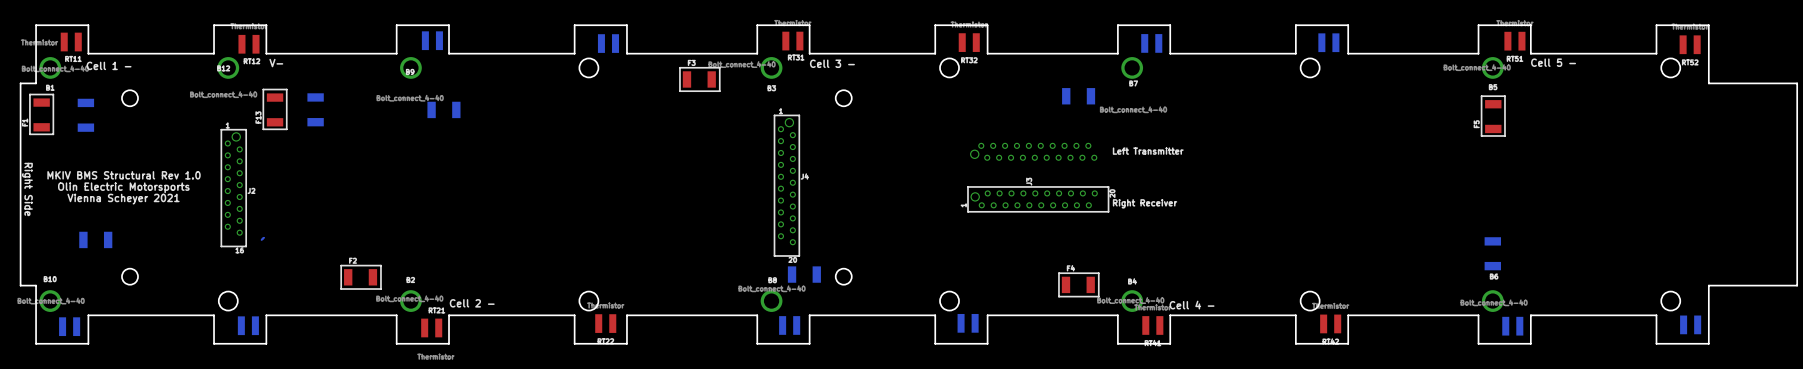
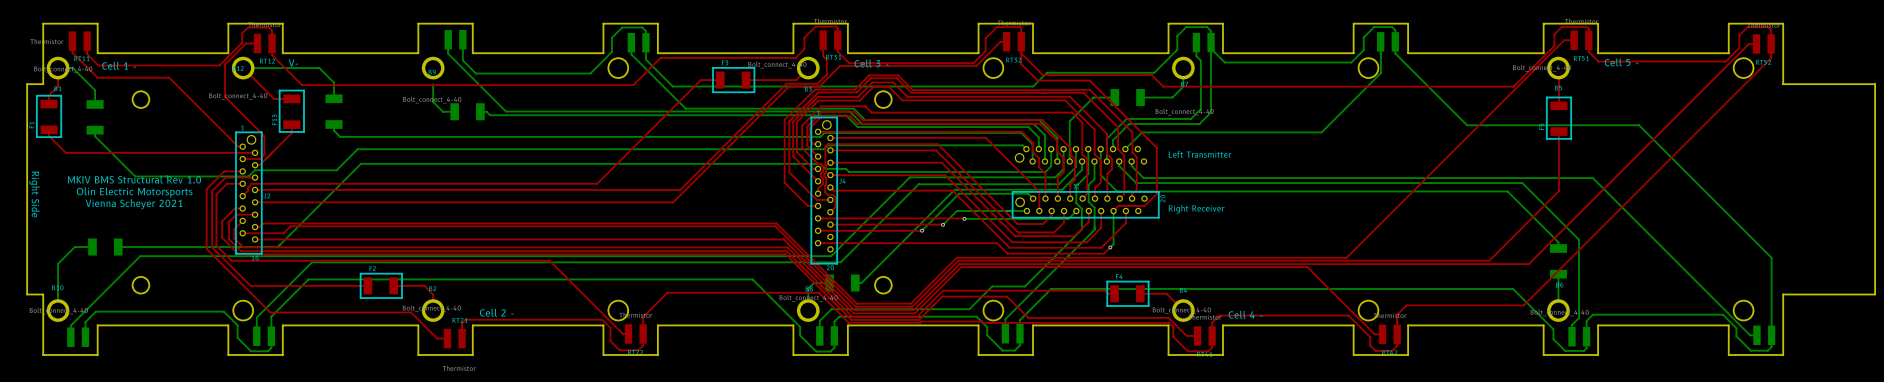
bottom track: none -> (448, 39) (448, 53) (505, 111) (849, 111) (862, 124) (1034, 124) (1044, 135) (1044, 161)
bottom track: none -> (462, 39) (462, 60) (475, 73) (590, 73) (611, 52) (611, 37) (622, 27) (642, 27) (645, 31) (645, 59) (672, 86) (1033, 86) (1046, 72) (1154, 72) (1177, 49) (1177, 36) (1186, 27) (1207, 27) (1211, 30) (1211, 112) (1199, 124) (1129, 124) (1113, 140) (1113, 149)
top track: none -> (823, 40) (823, 56) (826, 59) (826, 74) (817, 83) (786, 83) (680, 189) (255, 189)
top track: none -> (1574, 40) (1564, 40) (1346, 257) (956, 257) (910, 303) (856, 303) (776, 223) (263, 223) (259, 227) (255, 227)
top track: none -> (72, 41) (72, 52) (97, 77) (169, 77) (238, 146) (242, 146)
top track: none -> (87, 41) (87, 54) (98, 65) (219, 65) (227, 57)
top track: none -> (1006, 41) (1000, 41) (976, 65) (840, 65) (819, 86) (788, 86) (673, 202) (255, 202)
bottom track: none -> (1380, 41) (1380, 73) (1321, 132) (1142, 132) (1125, 149)
bottom track: none -> (631, 42) (631, 54) (685, 108) (853, 108) (865, 120) (1039, 120) (1057, 138) (1057, 161)
bottom track: none -> (1196, 42) (1196, 56) (1200, 60) (1200, 109) (1191, 118) (1126, 118) (1106, 138) (1106, 161)
top track: none -> (257, 43) (246, 43) (225, 64) (225, 96) (264, 136) (264, 154) (259, 159) (242, 159)
top track: none -> (1756, 43) (1748, 43) (1528, 264) (959, 264) (913, 310) (854, 310) (783, 239) (255, 239)
bottom track: none -> (1211, 48) (1224, 62) (1351, 62) (1363, 50) (1363, 37) (1374, 27) (1392, 27) (1395, 30) (1395, 53) (1467, 125) (1639, 125) (1771, 257) (1771, 346) (1767, 350) (1750, 350) (1736, 336) (1736, 328) (1722, 314) (1592, 314) (1586, 321) (1586, 348) (1583, 350) (1565, 350) (1553, 339) (1553, 329) (1513, 288) (1051, 288) (1020, 320) (1020, 345) (1014, 350) (1002, 350) (987, 335) (987, 327) (976, 316) (839, 316) (834, 321) (834, 347) (830, 351) (816, 351) (800, 335) (800, 326) (752, 279) (308, 279) (271, 316) (271, 347) (267, 351) (251, 351) (237, 337) (237, 325) (223, 311) (95, 311) (85, 322) (85, 337)
top track: none -> (1021, 53) (1042, 75) (1151, 75) (1163, 86) (1513, 86) (1554, 45) (1554, 34) (1561, 26) (1587, 26) (1588, 28) (1588, 51) (1598, 61) (1725, 61) (1739, 48) (1739, 35) (1747, 27) (1768, 27) (1771, 29) (1771, 57) (1523, 305) (1406, 305) (1397, 314) (1397, 345) (1392, 350) (1375, 350) (1370, 345) (1370, 337) (1348, 315) (1219, 315) (1212, 322) (1212, 347) (1208, 351) (1187, 351) (1173, 336) (1173, 326) (1169, 322) (848, 322) (818, 292) (667, 292) (643, 317) (643, 345) (638, 350) (619, 350) (610, 341) (610, 328) (602, 319) (465, 319) (462, 323) (462, 338)
top track: none -> (227, 57) (242, 42) (242, 33) (248, 27) (269, 27) (272, 30) (272, 55) (302, 85) (633, 85) (660, 57) (795, 57) (804, 49) (804, 37) (815, 26) (837, 28) (837, 51) (849, 63) (973, 63) (985, 51) (985, 38) (997, 27) (1020, 27) (1021, 64) (1037, 80) (1089, 80) (1156, 147) (1156, 193) (1144, 205) (1118, 205) (1113, 211)
bottom track: none -> (58, 68) (72, 68) (95, 90) (95, 104)
top track: none -> (58, 68) (58, 86) (49, 95) (49, 104)
bottom track: none -> (243, 68) (319, 68) (334, 82) (334, 98)
top track: none -> (243, 68) (274, 98) (291, 98)
top track: none -> (808, 68) (796, 80) (746, 80)
bottom track: none -> (1183, 68) (1183, 86) (1172, 97) (1140, 97)
top track: none -> (1558, 68) (1558, 105)
top track: none -> (720, 80) (700, 80) (597, 183) (251, 183) (242, 196)
bottom track: none -> (433, 84) (433, 101) (443, 111) (454, 111)
bottom track: none -> (1114, 97) (1093, 97) (1069, 121) (1069, 161)
bottom track: none -> (480, 111) (486, 111) (490, 115) (846, 115) (857, 127) (1028, 127) (1038, 137) (1038, 149)
top track: none -> (291, 124) (291, 132) (259, 165) (255, 165)
bottom track: none -> (334, 124) (334, 130) (340, 136) (820, 136) (824, 132) (1021, 132) (1032, 144) (1032, 161)
top track: none -> (49, 129) (49, 136) (65, 152) (255, 152)
bottom track: none -> (95, 130) (95, 136) (135, 176) (248, 176) (254, 170) (336, 170) (357, 149) (824, 149) (828, 145) (1022, 145) (1026, 149)
top track: none -> (1558, 131) (1558, 191) (1489, 260) (958, 260) (912, 306) (855, 306) (775, 226) (290, 226) (283, 233) (242, 233)
top track: none -> (818, 131) (1021, 131) (1032, 142) (1032, 151) (1038, 158) (1038, 167) (1045, 173) (1045, 198)
top track: none -> (830, 137) (985, 137) (1039, 191) (1039, 211)
top track: none -> (818, 144) (813, 144) (810, 140) (810, 127) (821, 116) (850, 116) (857, 123) (1040, 123) (1057, 140) (1057, 151) (1063, 157) (1063, 172) (1057, 177) (1057, 198)
bottom track: none -> (1051, 149) (1051, 166) (1045, 172) (849, 172) (846, 168) (825, 168) (820, 163) (360, 163) (280, 244)
bottom track: none -> (1063, 149) (1063, 169) (1055, 177) (909, 177) (831, 256) (140, 256) (70, 325) (70, 337)
bottom track: none -> (1075, 149) (1075, 167) (1058, 184) (918, 184) (840, 262) (311, 262) (256, 317) (256, 336)
bottom track: none -> (1088, 149) (1088, 174) (1076, 186) (1076, 203) (1081, 208) (1081, 229) (1024, 286) (992, 286) (969, 309) (831, 309) (819, 320) (819, 335)
bottom track: none -> (1100, 149) (1100, 174) (1117, 191) (1507, 191) (1558, 242) (1558, 248)
top track: none -> (830, 150) (935, 150) (1018, 232) (1054, 232) (1064, 222) (1064, 211)
top track: none -> (818, 156) (807, 145) (807, 126) (822, 111) (854, 111) (862, 119) (1042, 119) (1070, 148) (1070, 155) (1074, 159) (1074, 179) (1070, 184) (1070, 198)
bottom track: none -> (1082, 161) (1082, 169) (1062, 189) (954, 189) (861, 283) (855, 283)
bottom track: none -> (1094, 161) (1094, 179) (1088, 184) (1088, 201) (1094, 207) (1094, 229) (1005, 319) (1005, 333)
bottom track: none -> (1119, 161) (1119, 165) (1136, 183) (1522, 183) (1579, 239) (1579, 318) (1571, 325) (1571, 336)
bottom track: none -> (1131, 161) (1131, 165) (1143, 178) (1592, 178) (1750, 335) (1756, 335)
top track: none -> (830, 162) (941, 162) (1015, 236) (1074, 236) (1088, 221) (1088, 211)
top track: none -> (818, 168) (813, 168) (796, 152) (796, 122) (818, 100) (859, 100) (873, 86) (888, 86) (902, 100) (1065, 100) (1094, 129) (1094, 154) (1100, 160) (1100, 182) (1094, 188) (1094, 198)
top track: none -> (825, 170) (825, 146) (827, 144) (937, 144) (1017, 223) (1043, 223) (1051, 215) (1051, 211)
top track: none -> (825, 170) (825, 191) (835, 197) (835, 207) (830, 212)
top track: none -> (242, 171) (224, 171) (206, 189) (206, 248) (270, 312) (411, 312) (437, 338) (447, 338)
top track: none -> (830, 175) (945, 175) (1012, 242) (1086, 242) (1101, 227) (1101, 211)
top track: none -> (255, 177) (225, 177) (212, 191) (212, 247) (250, 285) (367, 285)
top track: none -> (818, 181) (793, 156) (793, 121) (817, 96) (858, 96) (872, 82) (893, 82) (907, 96) (1069, 96) (1106, 133) (1106, 153) (1111, 158) (1111, 169) (1107, 173) (1107, 198)
top track: none -> (242, 183) (226, 183) (216, 194) (216, 245) (231, 260) (549, 260) (605, 316)
top track: none -> (830, 187) (833, 190) (952, 190) (1009, 247) (1101, 247) (1125, 223) (1125, 211)
top track: none -> (818, 193) (818, 188) (823, 183) (820, 176) (823, 166) (802, 148) (802, 125) (821, 106) (865, 106) (871, 112) (1072, 112) (1082, 122) (1082, 154) (1087, 159) (1087, 194) (1082, 198)
bottom track: none -> (1033, 198) (1028, 193) (959, 193) (922, 230)
top track: none -> (1119, 198) (1124, 194) (1124, 155) (1118, 149) (1118, 127) (1083, 92) (911, 92) (896, 78) (870, 78) (856, 92) (818, 92) (789, 121) (789, 172) (816, 199) (830, 199)
top track: none -> (1132, 198) (1132, 194) (1136, 189) (1136, 156) (1132, 152) (1132, 132) (1090, 90) (912, 90) (898, 75) (869, 75) (854, 89) (814, 89) (784, 119) (784, 182) (807, 206) (818, 206)
top track: none -> (242, 208) (234, 208) (222, 221) (222, 237) (238, 254) (785, 254) (851, 319) (919, 319) (942, 296) (1007, 296) (1028, 317) (1168, 317) (1186, 335) (1197, 335)
bottom track: none -> (1026, 211) (956, 211) (943, 224)
bottom track: none -> (1076, 211) (1068, 218) (964, 218)
bottom track: none -> (1113, 211) (1113, 244) (1110, 247)
top track: none -> (255, 214) (236, 214) (229, 221) (229, 239) (241, 251) (786, 251) (852, 317) (916, 317) (943, 290) (1105, 290) (1108, 293) (1114, 293)
top track: none -> (818, 218) (964, 218)
via: none -> (964, 218)
top track: none -> (242, 220) (234, 229) (234, 238) (243, 247) (787, 247) (853, 313) (914, 313) (961, 267) (1307, 267) (1374, 334) (1382, 334)
top track: none -> (830, 224) (943, 224)
via: none -> (943, 224)
top track: none -> (922, 230) (818, 230)
via: none -> (922, 230)
top track: none -> (818, 243) (997, 243) (1007, 253) (1104, 253) (1110, 247)
bottom track: none -> (92, 247) (74, 247) (58, 263) (58, 310)
bottom track: none -> (118, 247) (277, 247)
via: none -> (1110, 247)
bottom track: none -> (1558, 274) (1558, 310)
bottom track: none -> (829, 283) (813, 283) (808, 288) (808, 310)
top track: none -> (393, 285) (424, 285) (433, 294) (433, 310)
top track: none -> (1140, 293) (1166, 293) (1183, 310)
top track: none -> (605, 316) (622, 333) (628, 333)

